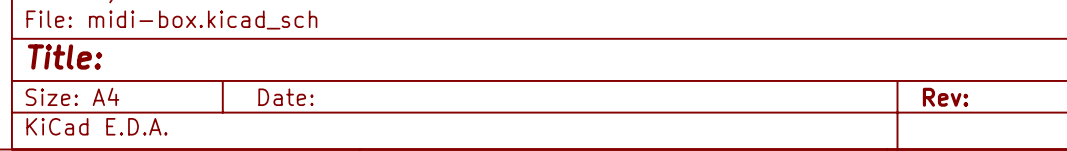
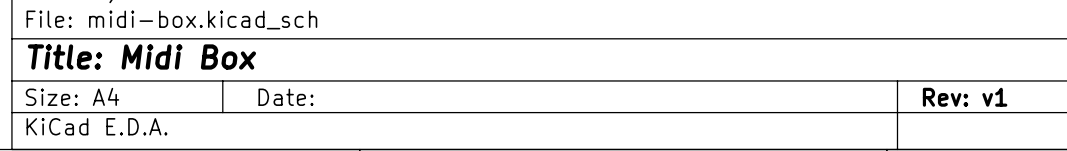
title block: Title: (64, 56) -> Title: Midi Box (141, 56)
title block: Rev: (945, 97) -> Rev: v1 (965, 97)

